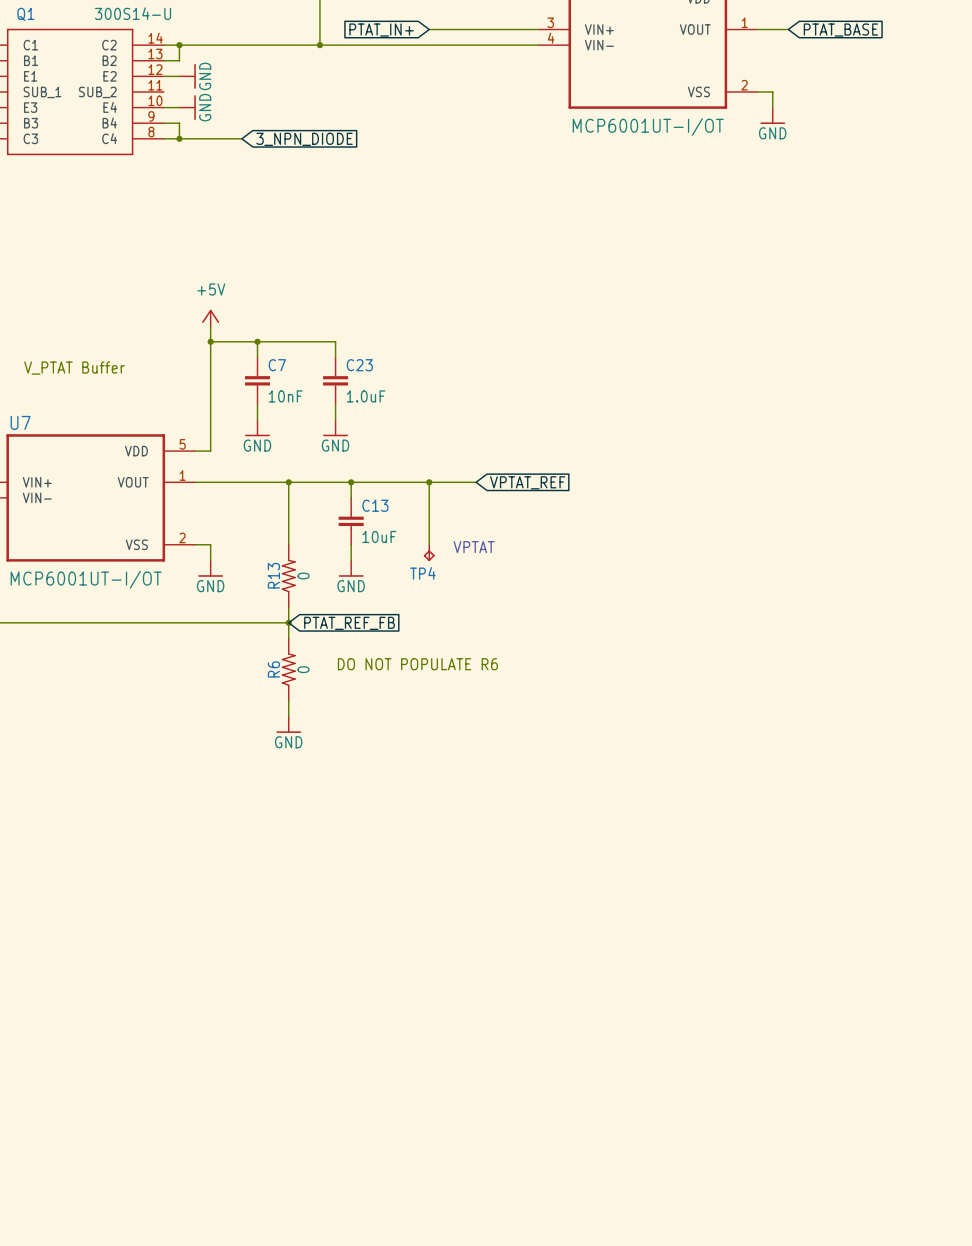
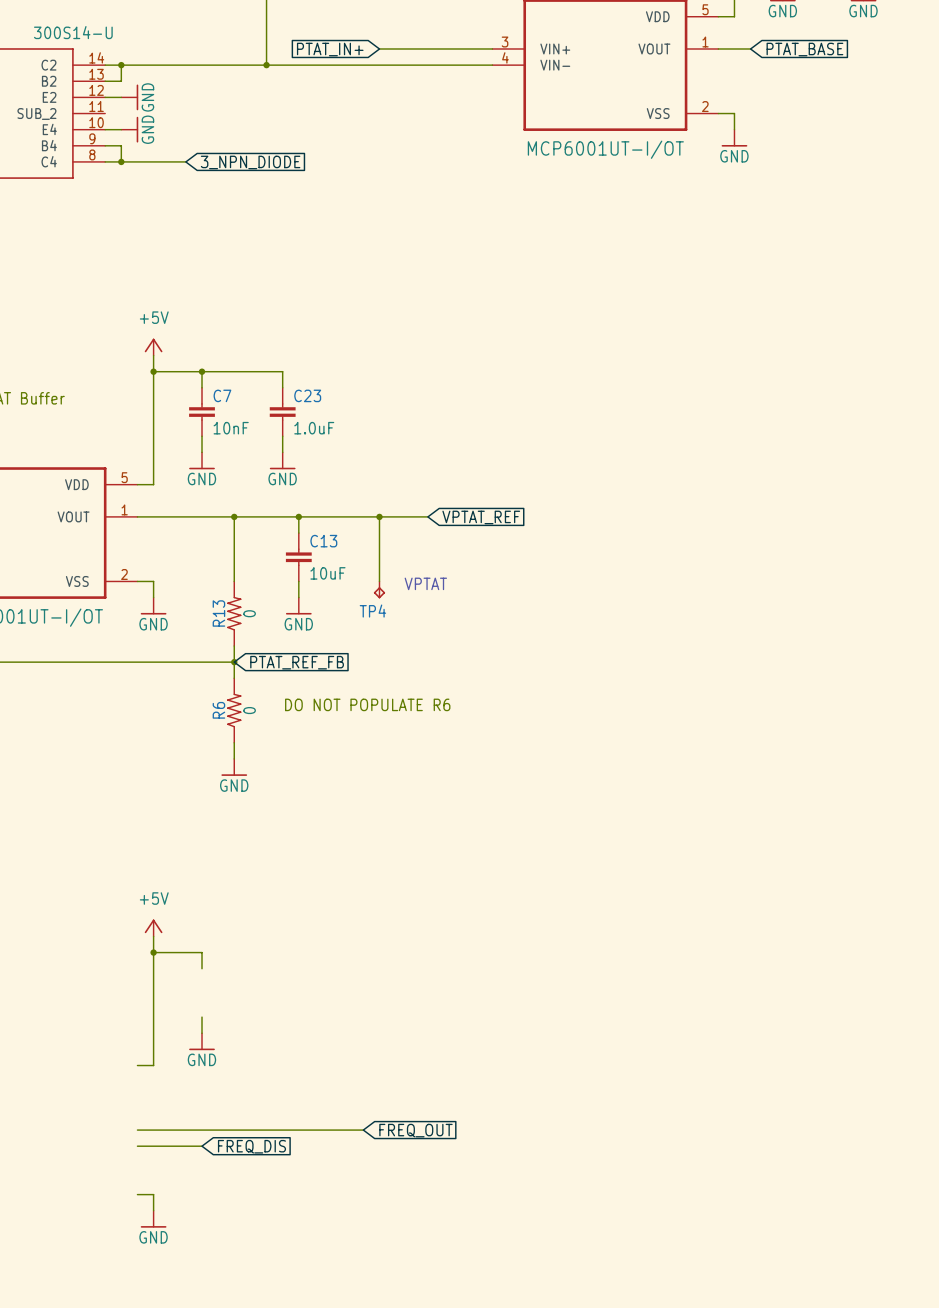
power symbol: none -> +5V (153, 927)
wire: none -> (153, 936) (153, 1065) (137, 1065)
wire: none -> (153, 952) (202, 952) (202, 968)
junction: none -> (153, 952)
wire: none -> (202, 1017) (202, 1033)
power symbol: none -> GND (202, 1041)
wire: none -> (137, 1130) (363, 1130)
global label: none -> FREQ_OUT (415, 1130)
wire: none -> (137, 1146) (202, 1146)
global label: none -> FREQ_DIS (251, 1146)
wire: none -> (137, 1194) (153, 1194) (153, 1210)
power symbol: none -> GND (153, 1219)

